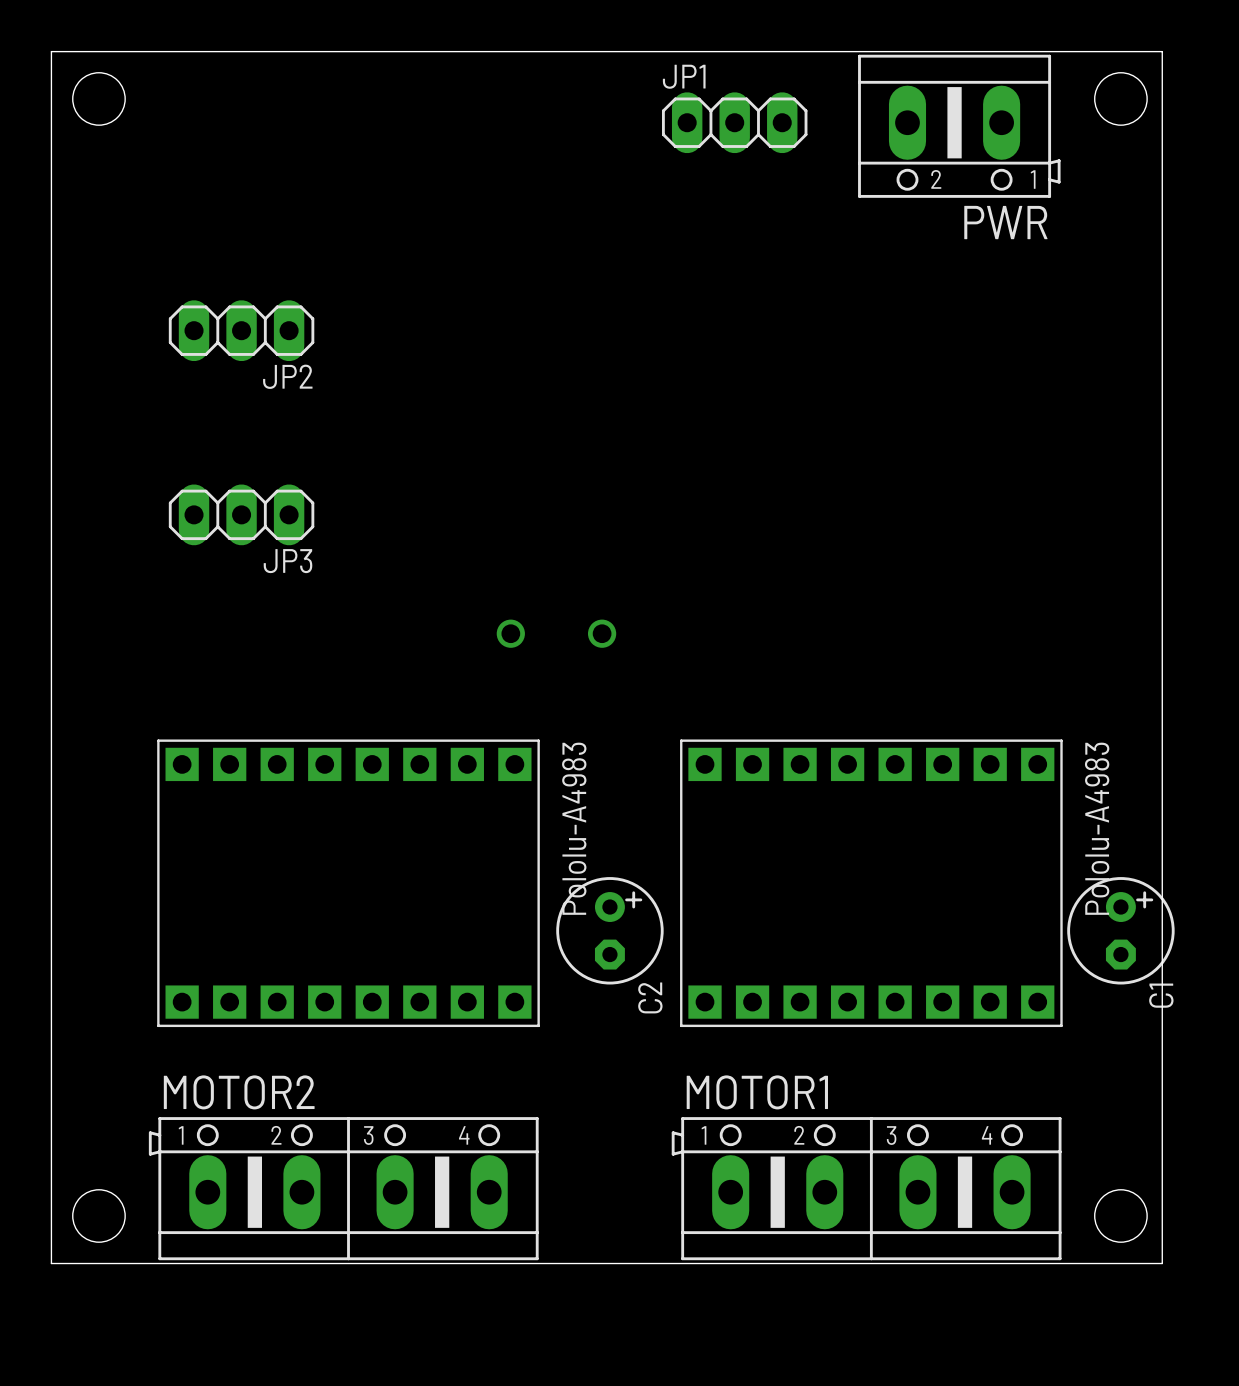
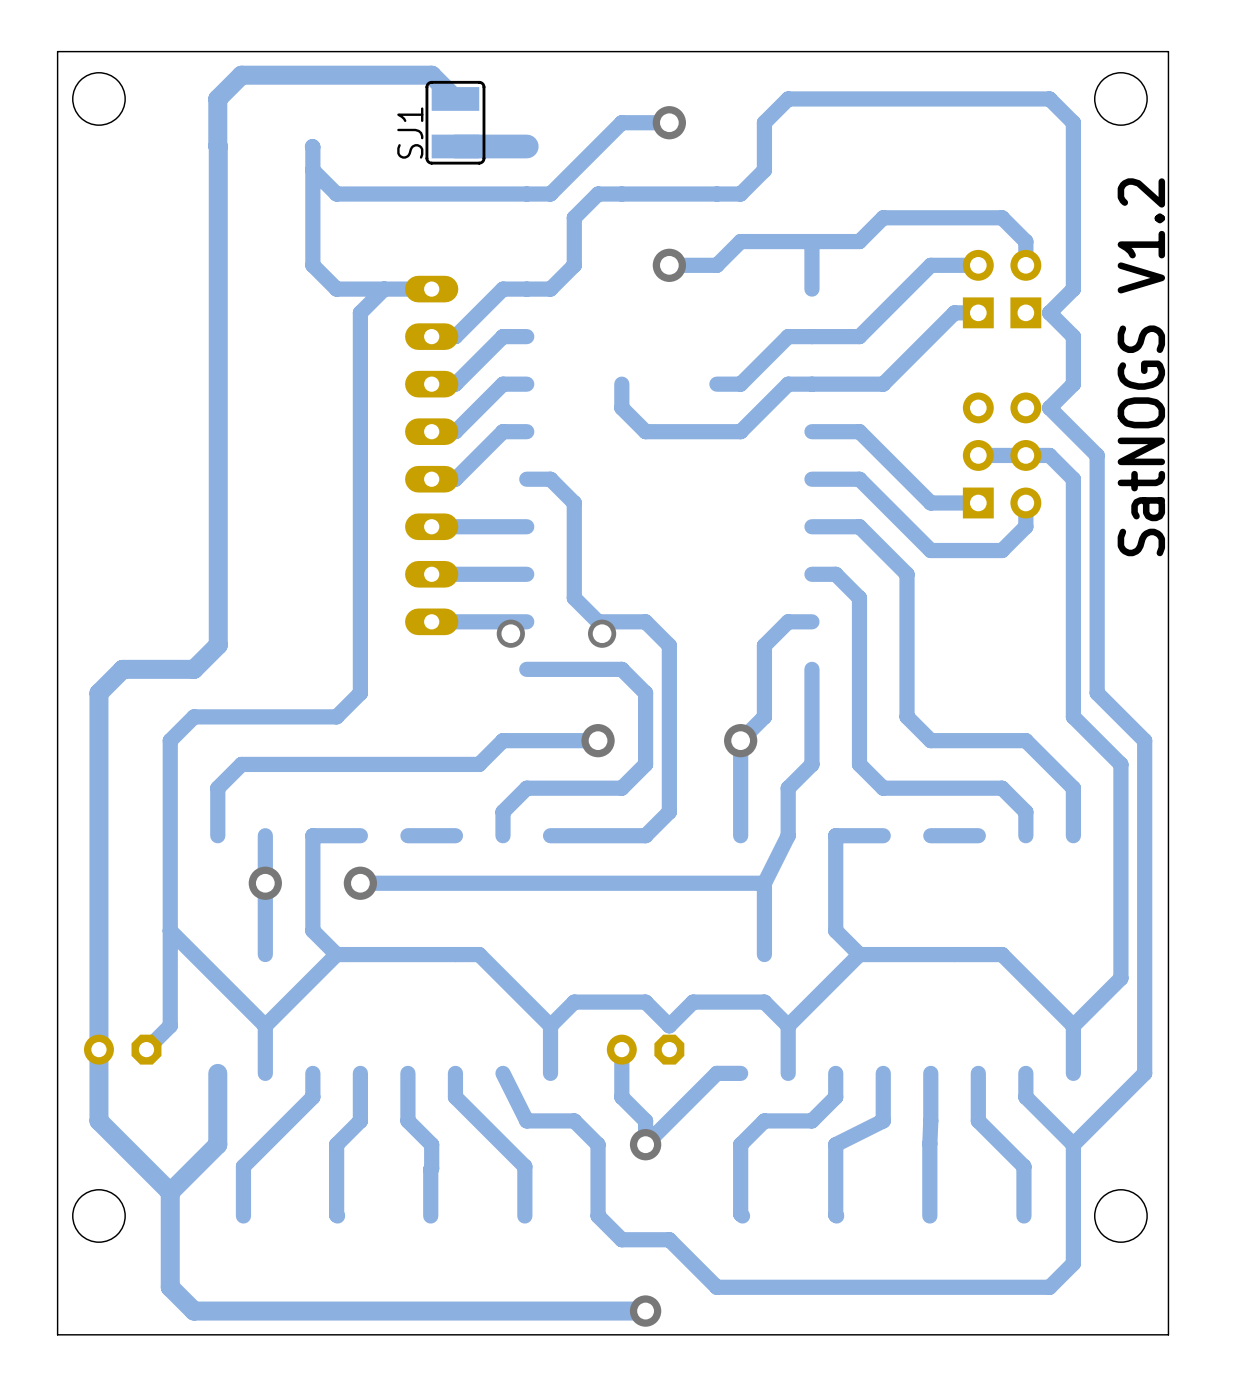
board edge: (1162, 51) (1162, 1263) (51, 1263) (51, 51) (57, 51) -> (1162, 51) (1168, 51) (1168, 1334) (57, 1334) (57, 51)
track: none -> (455, 98) (431, 75) (241, 75) (217, 98) (218, 645) (194, 669) (122, 669) (98, 693) (98, 1120) (170, 1192)
SJ1: none -> (455, 122)
track: none -> (669, 122) (621, 122) (550, 194) (336, 194) (312, 170)
via: none -> (669, 122)
JP1: (734, 122) -> none
PWR: (959, 126) -> none
track: none -> (312, 146) (312, 265) (336, 289) (431, 289)
track: none -> (526, 146) (455, 146)
track: none -> (811, 241) (811, 289)
via: none -> (669, 265)
track: none -> (978, 265) (930, 265) (859, 336) (788, 336) (740, 384) (716, 384)
track: none -> (1025, 265) (1025, 241) (1002, 217) (883, 217) (859, 241) (740, 241) (716, 265) (669, 265)
track: none -> (384, 289) (360, 312) (360, 693) (336, 716) (194, 716) (170, 740) (170, 1025) (146, 1049)
part: none -> (978, 289)
part: none -> (1025, 289)
track: none -> (978, 312) (954, 312) (883, 384) (788, 384) (740, 431) (645, 431) (621, 407) (621, 384)
text: none -> SatNOGS V1.2 (1141, 367)
JP2: (241, 330) -> none
track: none -> (431, 336) (455, 336) (502, 289) (550, 289) (574, 265) (574, 217) (598, 194) (740, 194) (764, 170) (764, 122) (788, 98) (1049, 98) (1073, 122) (1073, 289) (1049, 312) (1073, 336) (1073, 384) (1049, 407) (1097, 455) (1097, 693) (1144, 740) (1144, 1073) (1073, 1144)
track: none -> (526, 336) (502, 336) (455, 384) (431, 384)
track: none -> (526, 384) (502, 384) (455, 431) (431, 431)
track: none -> (526, 431) (502, 431) (455, 479) (431, 479)
track: none -> (811, 431) (859, 431) (930, 502) (978, 502)
part: none -> (431, 455)
track: none -> (978, 455) (1049, 455) (1073, 479) (1073, 716) (1120, 764) (1120, 978) (1073, 1025)
part: none -> (1002, 455)
track: none -> (526, 479) (550, 479) (574, 502) (574, 598) (598, 621) (645, 621) (669, 645) (669, 811) (645, 835) (550, 835)
track: none -> (811, 479) (859, 479) (930, 550) (1002, 550) (1025, 526) (1025, 502)
JP3: (241, 514) -> none
track: none -> (526, 526) (431, 526)
track: none -> (811, 526) (859, 526) (907, 574) (907, 716) (930, 740) (1025, 740) (1073, 788) (1073, 835)
track: none -> (526, 574) (431, 574)
track: none -> (811, 574) (835, 574) (859, 598) (859, 764) (883, 788) (1002, 788) (1025, 811) (1025, 835)
track: none -> (526, 621) (431, 621)
track: none -> (811, 621) (788, 621) (764, 645) (764, 716) (740, 740) (740, 835)
track: none -> (526, 669) (621, 669) (645, 693) (645, 764) (621, 788) (526, 788) (502, 811) (502, 835)
track: none -> (811, 669) (811, 764) (788, 788) (788, 835) (764, 883)
track: none -> (598, 740) (502, 740) (479, 764) (241, 764) (217, 788) (217, 835)
via: none -> (598, 740)
via: none -> (740, 740)
track: none -> (265, 835) (265, 954)
track: none -> (360, 835) (312, 835) (312, 930) (336, 954)
track: none -> (455, 835) (407, 835)
track: none -> (883, 835) (835, 835) (835, 930) (859, 954)
track: none -> (978, 835) (930, 835)
via: none -> (265, 883)
part: (348, 883) -> none
via: none -> (360, 883)
track: none -> (764, 883) (764, 954)
track: none -> (764, 883) (360, 883)
part: (871, 883) -> none
track: none -> (170, 930) (265, 1025)
C2 side: bottom (609, 930) -> top (645, 1049)
C1: (1120, 930) -> none
track: none -> (336, 954) (479, 954) (550, 1025)
track: none -> (336, 954) (265, 1025)
track: none -> (859, 954) (1002, 954) (1073, 1025)
track: none -> (859, 954) (788, 1025)
track: none -> (265, 1025) (265, 1073)
track: none -> (550, 1025) (550, 1073)
track: none -> (788, 1025) (788, 1073)
track: none -> (788, 1025) (764, 1002) (693, 1002) (669, 1025) (645, 1002) (574, 1002) (550, 1025)
track: none -> (1073, 1025) (1073, 1073)
part: none -> (122, 1049)
track: none -> (621, 1049) (621, 1097) (645, 1120) (645, 1144) (716, 1073) (740, 1073)
track: none -> (217, 1073) (217, 1144) (170, 1192)
track: none -> (312, 1073) (312, 1097) (243, 1166) (243, 1215)
track: none -> (360, 1073) (360, 1120) (336, 1144) (337, 1215)
track: none -> (407, 1073) (407, 1120) (431, 1144) (430, 1215)
track: none -> (455, 1073) (455, 1097) (524, 1166) (524, 1215)
track: none -> (502, 1073) (526, 1120) (574, 1120) (598, 1144) (598, 1215) (621, 1239) (669, 1239) (716, 1287) (1049, 1287) (1073, 1263) (1073, 1144)
track: none -> (835, 1073) (835, 1097) (811, 1120) (764, 1120) (740, 1144) (740, 1214) (742, 1215)
track: none -> (883, 1073) (883, 1120) (835, 1144) (836, 1215)
track: none -> (930, 1073) (929, 1215)
track: none -> (978, 1073) (978, 1120) (1023, 1166) (1023, 1215)
track: none -> (1025, 1073) (1025, 1097) (1073, 1144)
via: none -> (645, 1144)
MOTOR2: (343, 1188) -> none
MOTOR1: (866, 1188) -> none
track: none -> (170, 1192) (170, 1287) (194, 1311) (645, 1311)
via: none -> (645, 1311)

